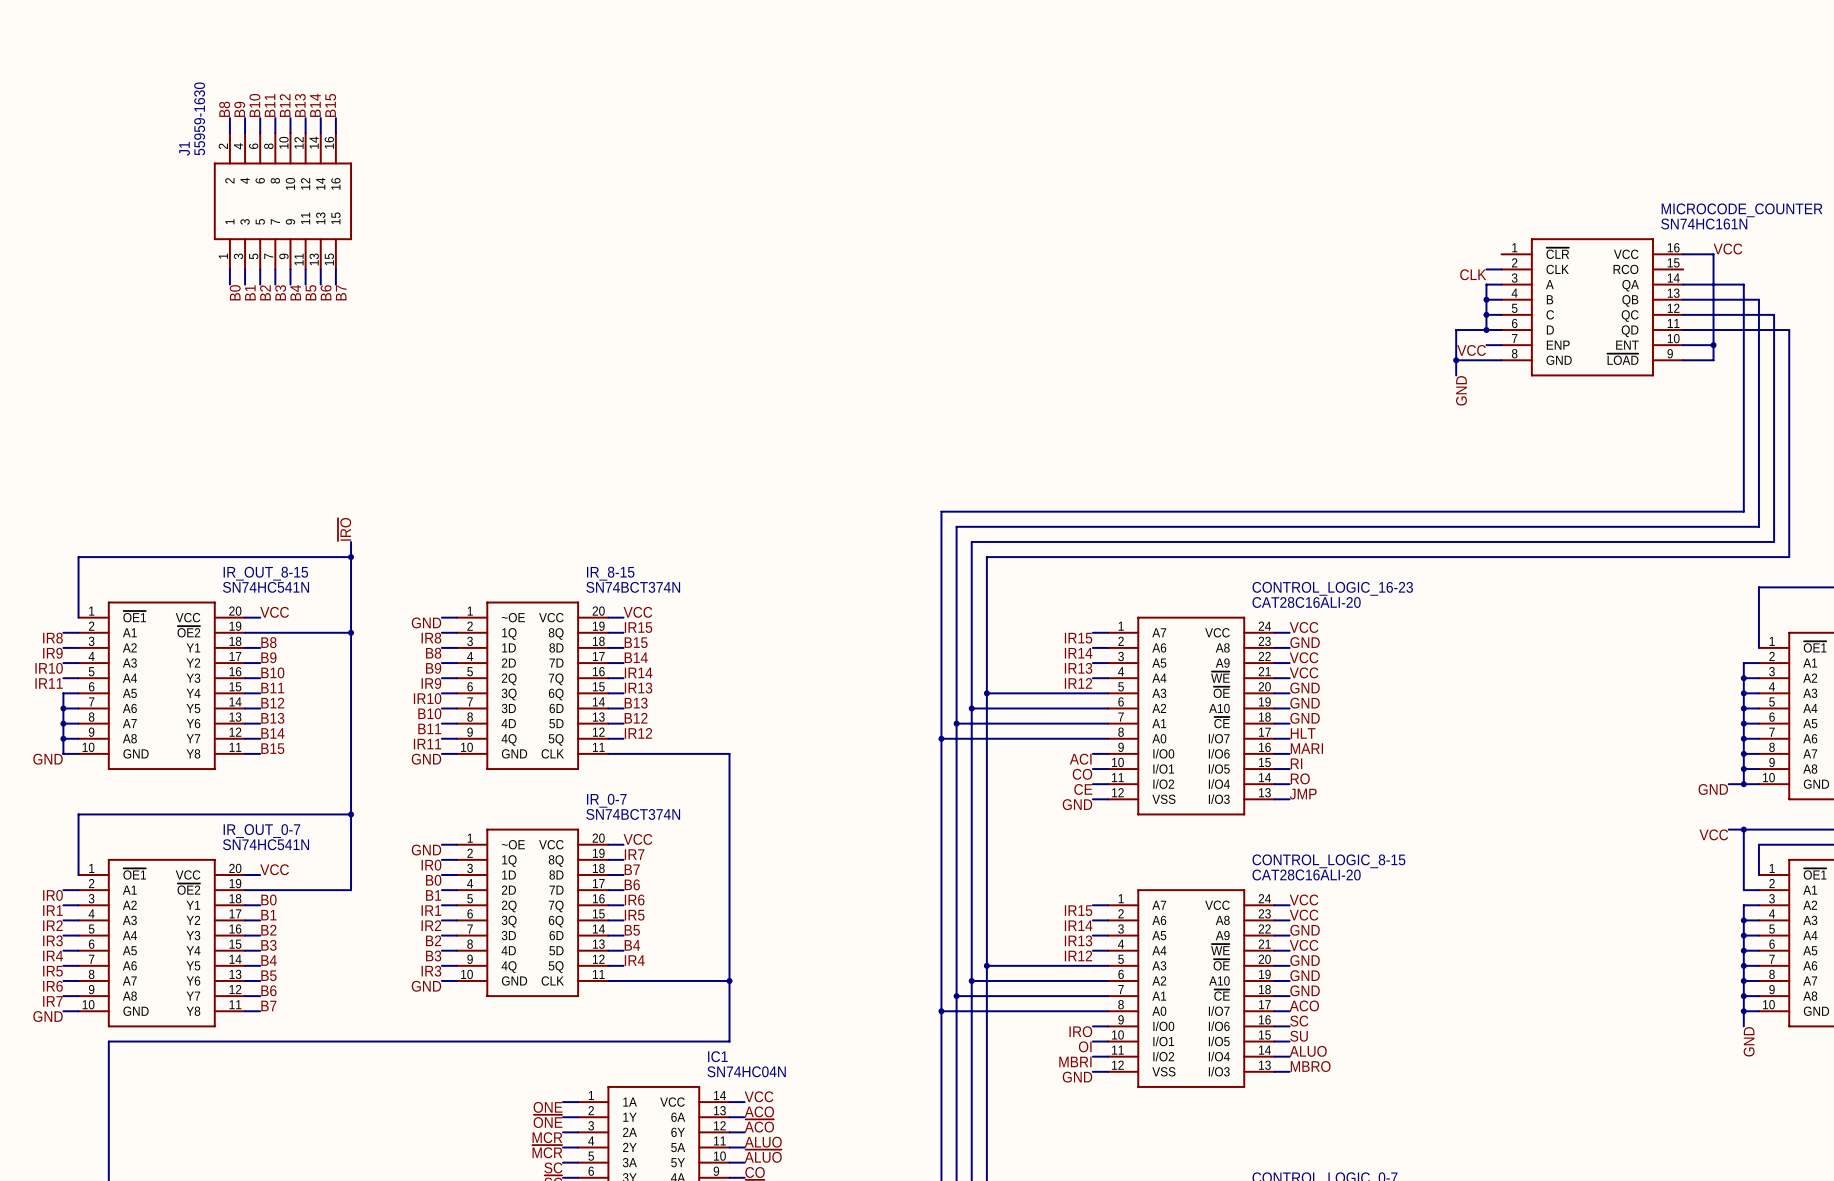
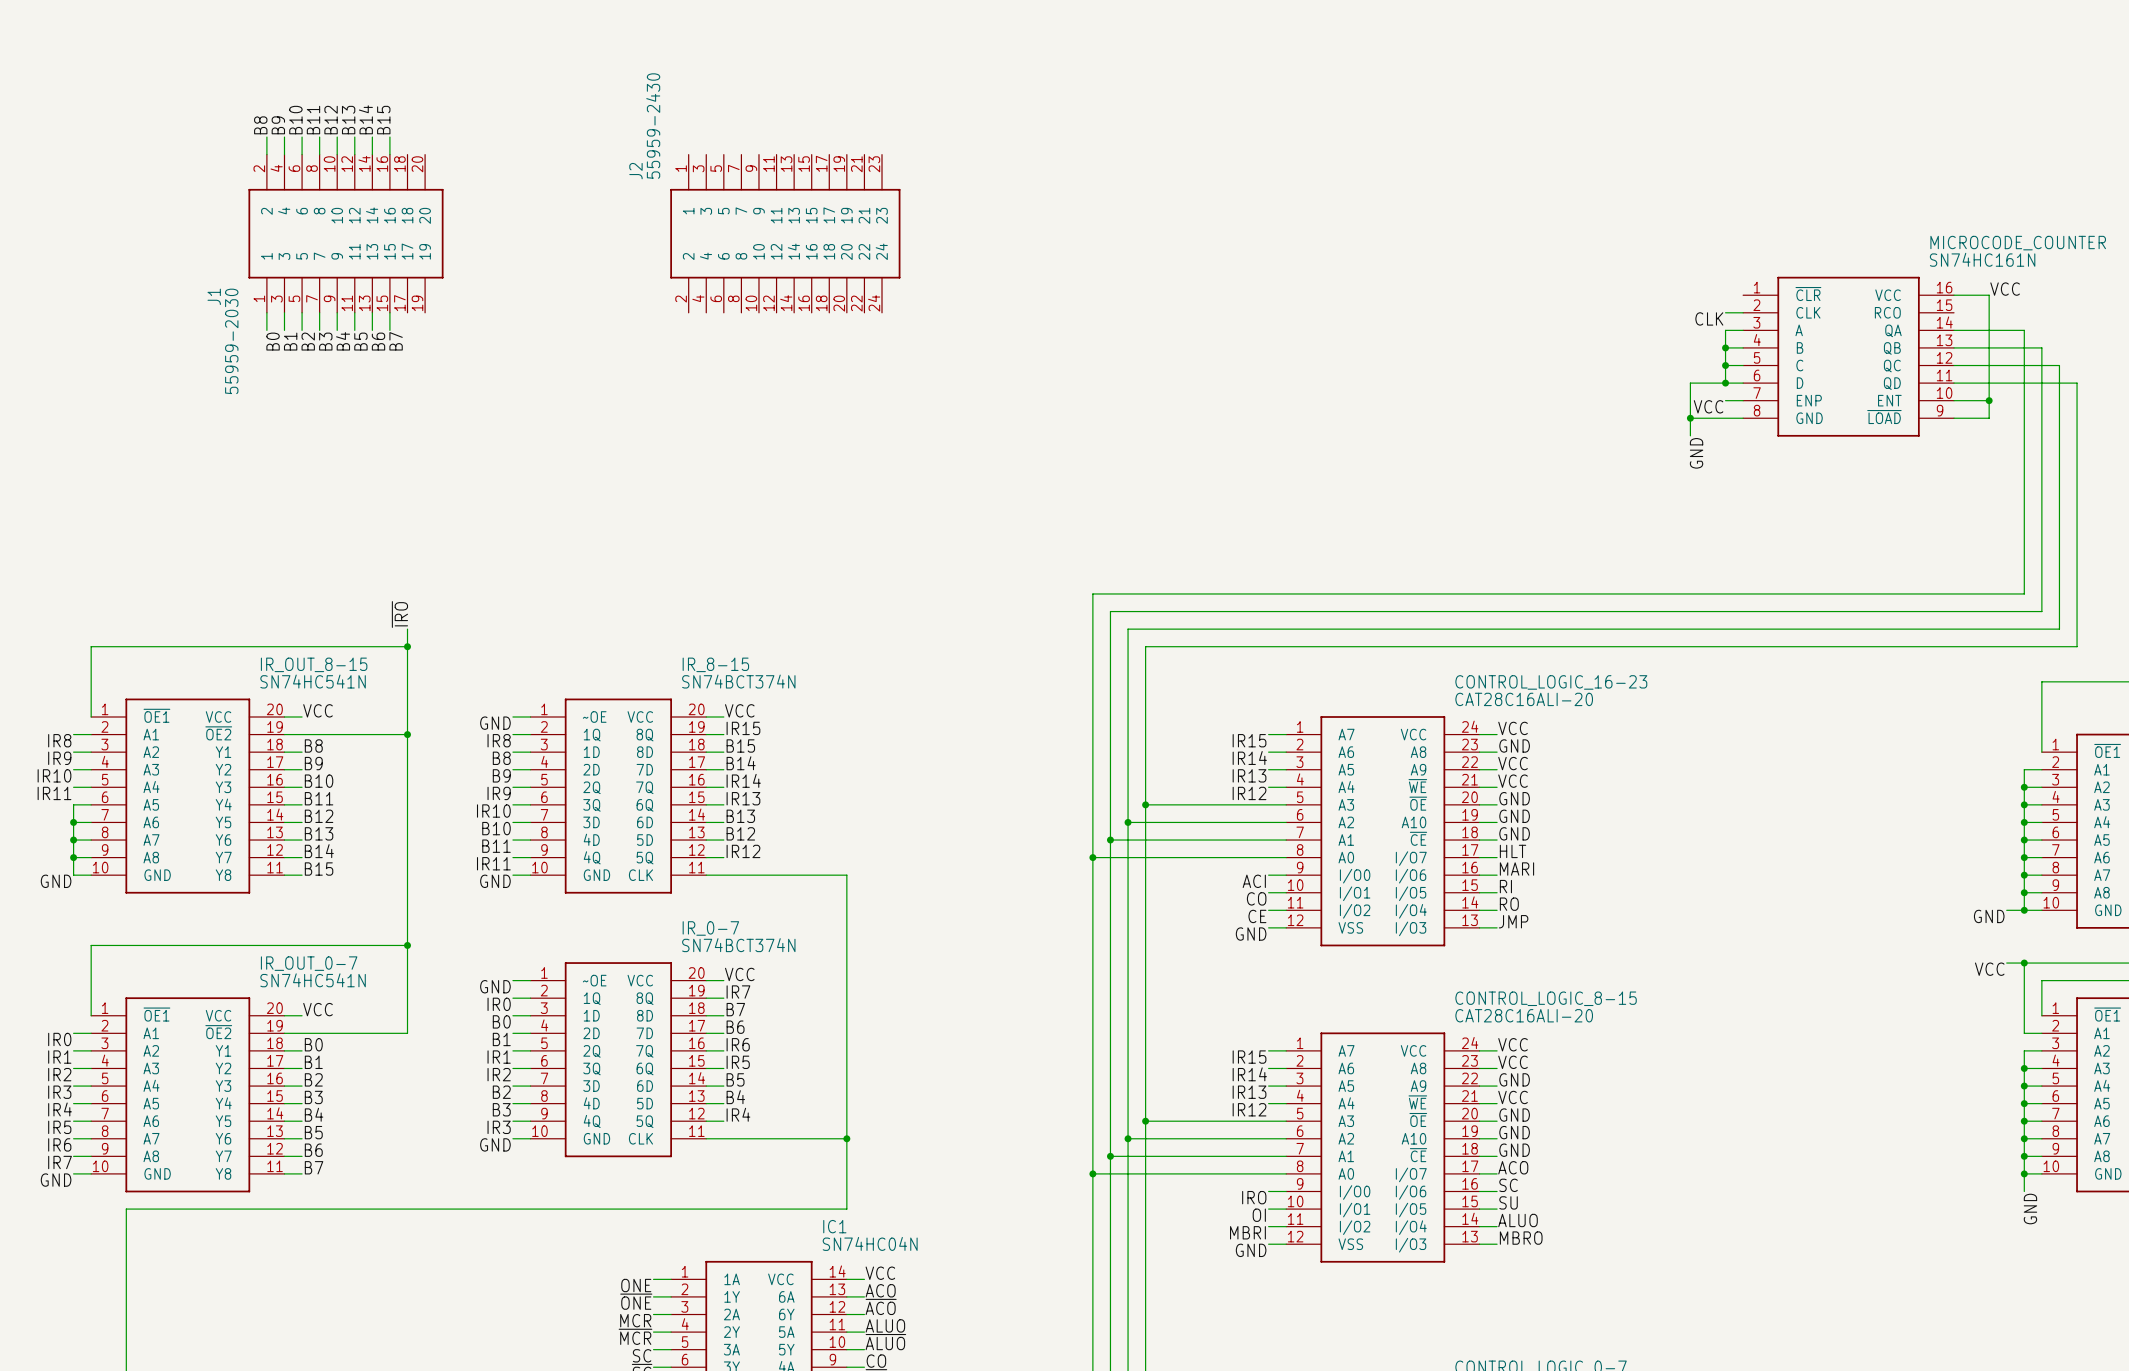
J1 value: 55959-1630 (199, 118) -> 55959-2030 (231, 341)
J1 symbol: [214, 133, 352, 270] -> [248, 154, 444, 313]
J1 name position: J1 (184, 148) -> J1 (214, 296)
J2: none -> 55959-2430 (785, 233)

